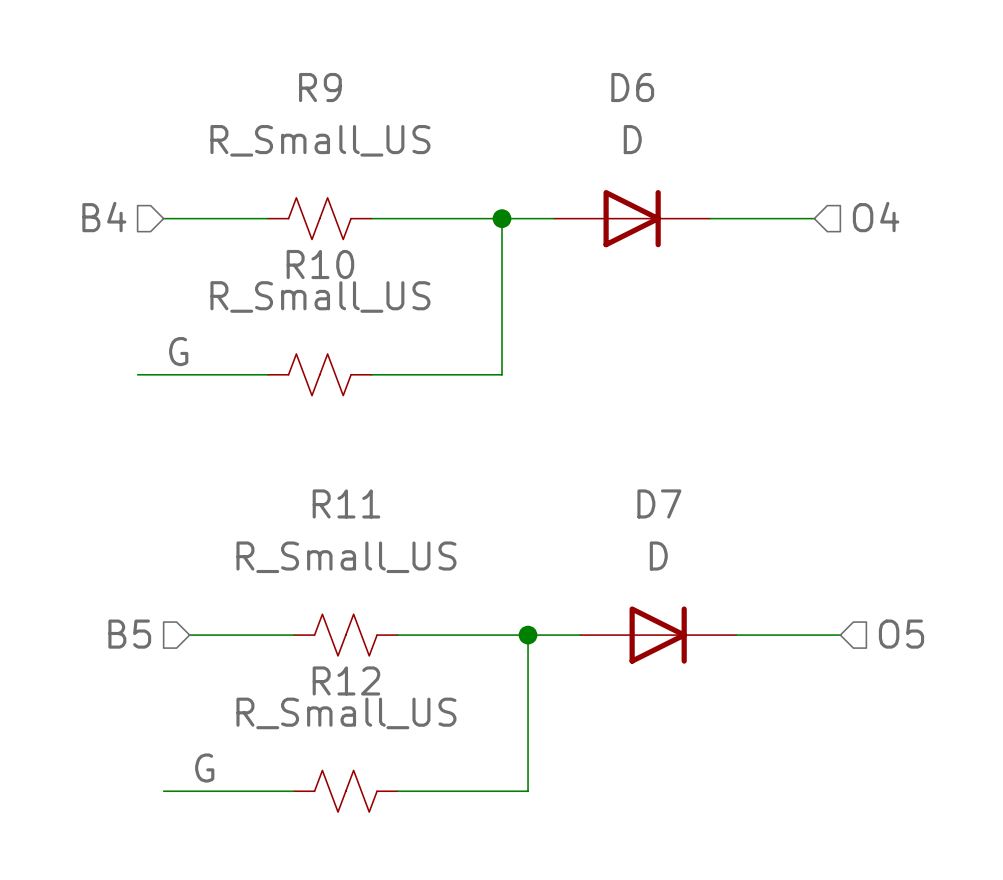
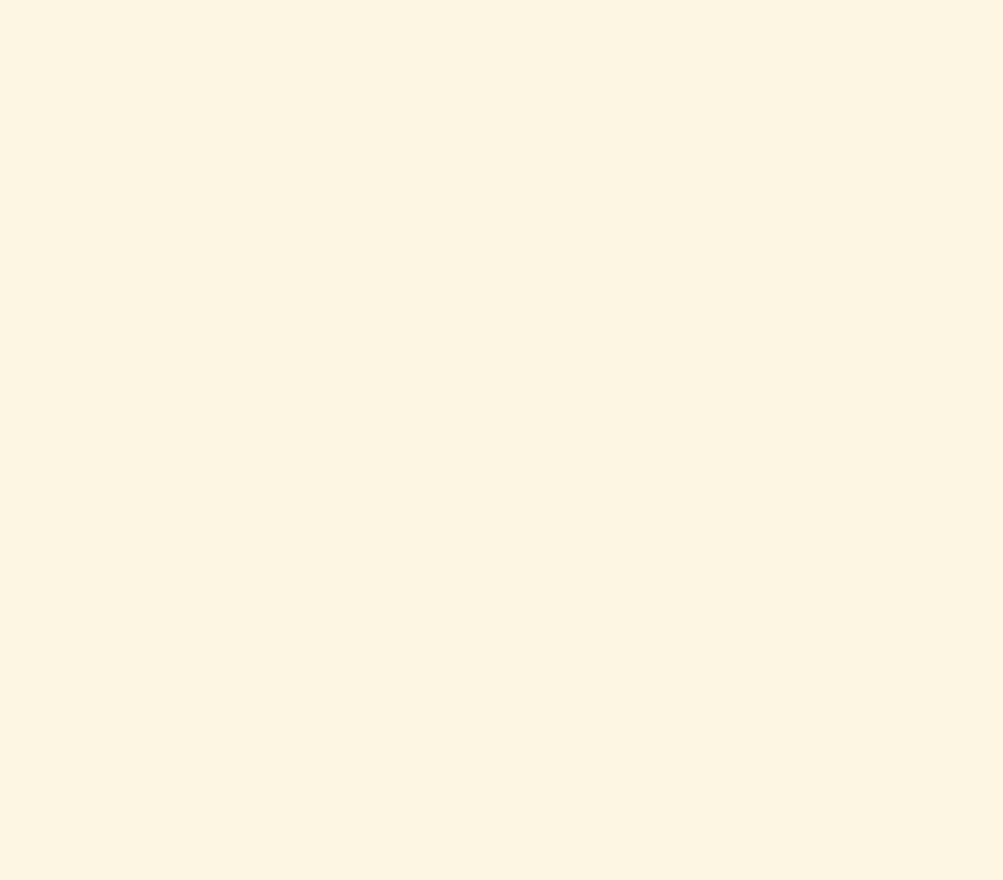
hierarchical label: B4 (104, 217) -> none
hierarchical label: O4 (876, 217) -> none
wire: (163, 218) (267, 218) -> none
R9: R_Small_US (319, 218) -> none
wire: (371, 218) (554, 218) -> none
wire: (501, 218) (501, 374) (371, 374) -> none
junction: (501, 218) -> none
D6: D (632, 218) -> none
wire: (710, 218) (814, 218) -> none
label: G (178, 351) -> none
wire: (137, 374) (267, 374) -> none
R10: R_Small_US (319, 374) -> none
hierarchical label: B5 (129, 634) -> none
hierarchical label: O5 (901, 634) -> none
wire: (189, 635) (293, 635) -> none
R11: R_Small_US (345, 635) -> none
wire: (397, 635) (580, 635) -> none
wire: (528, 635) (528, 791) (397, 791) -> none
junction: (528, 635) -> none
D7: D (658, 635) -> none
wire: (736, 635) (840, 635) -> none
label: G (204, 768) -> none
wire: (163, 791) (293, 791) -> none
R12: R_Small_US (345, 791) -> none

